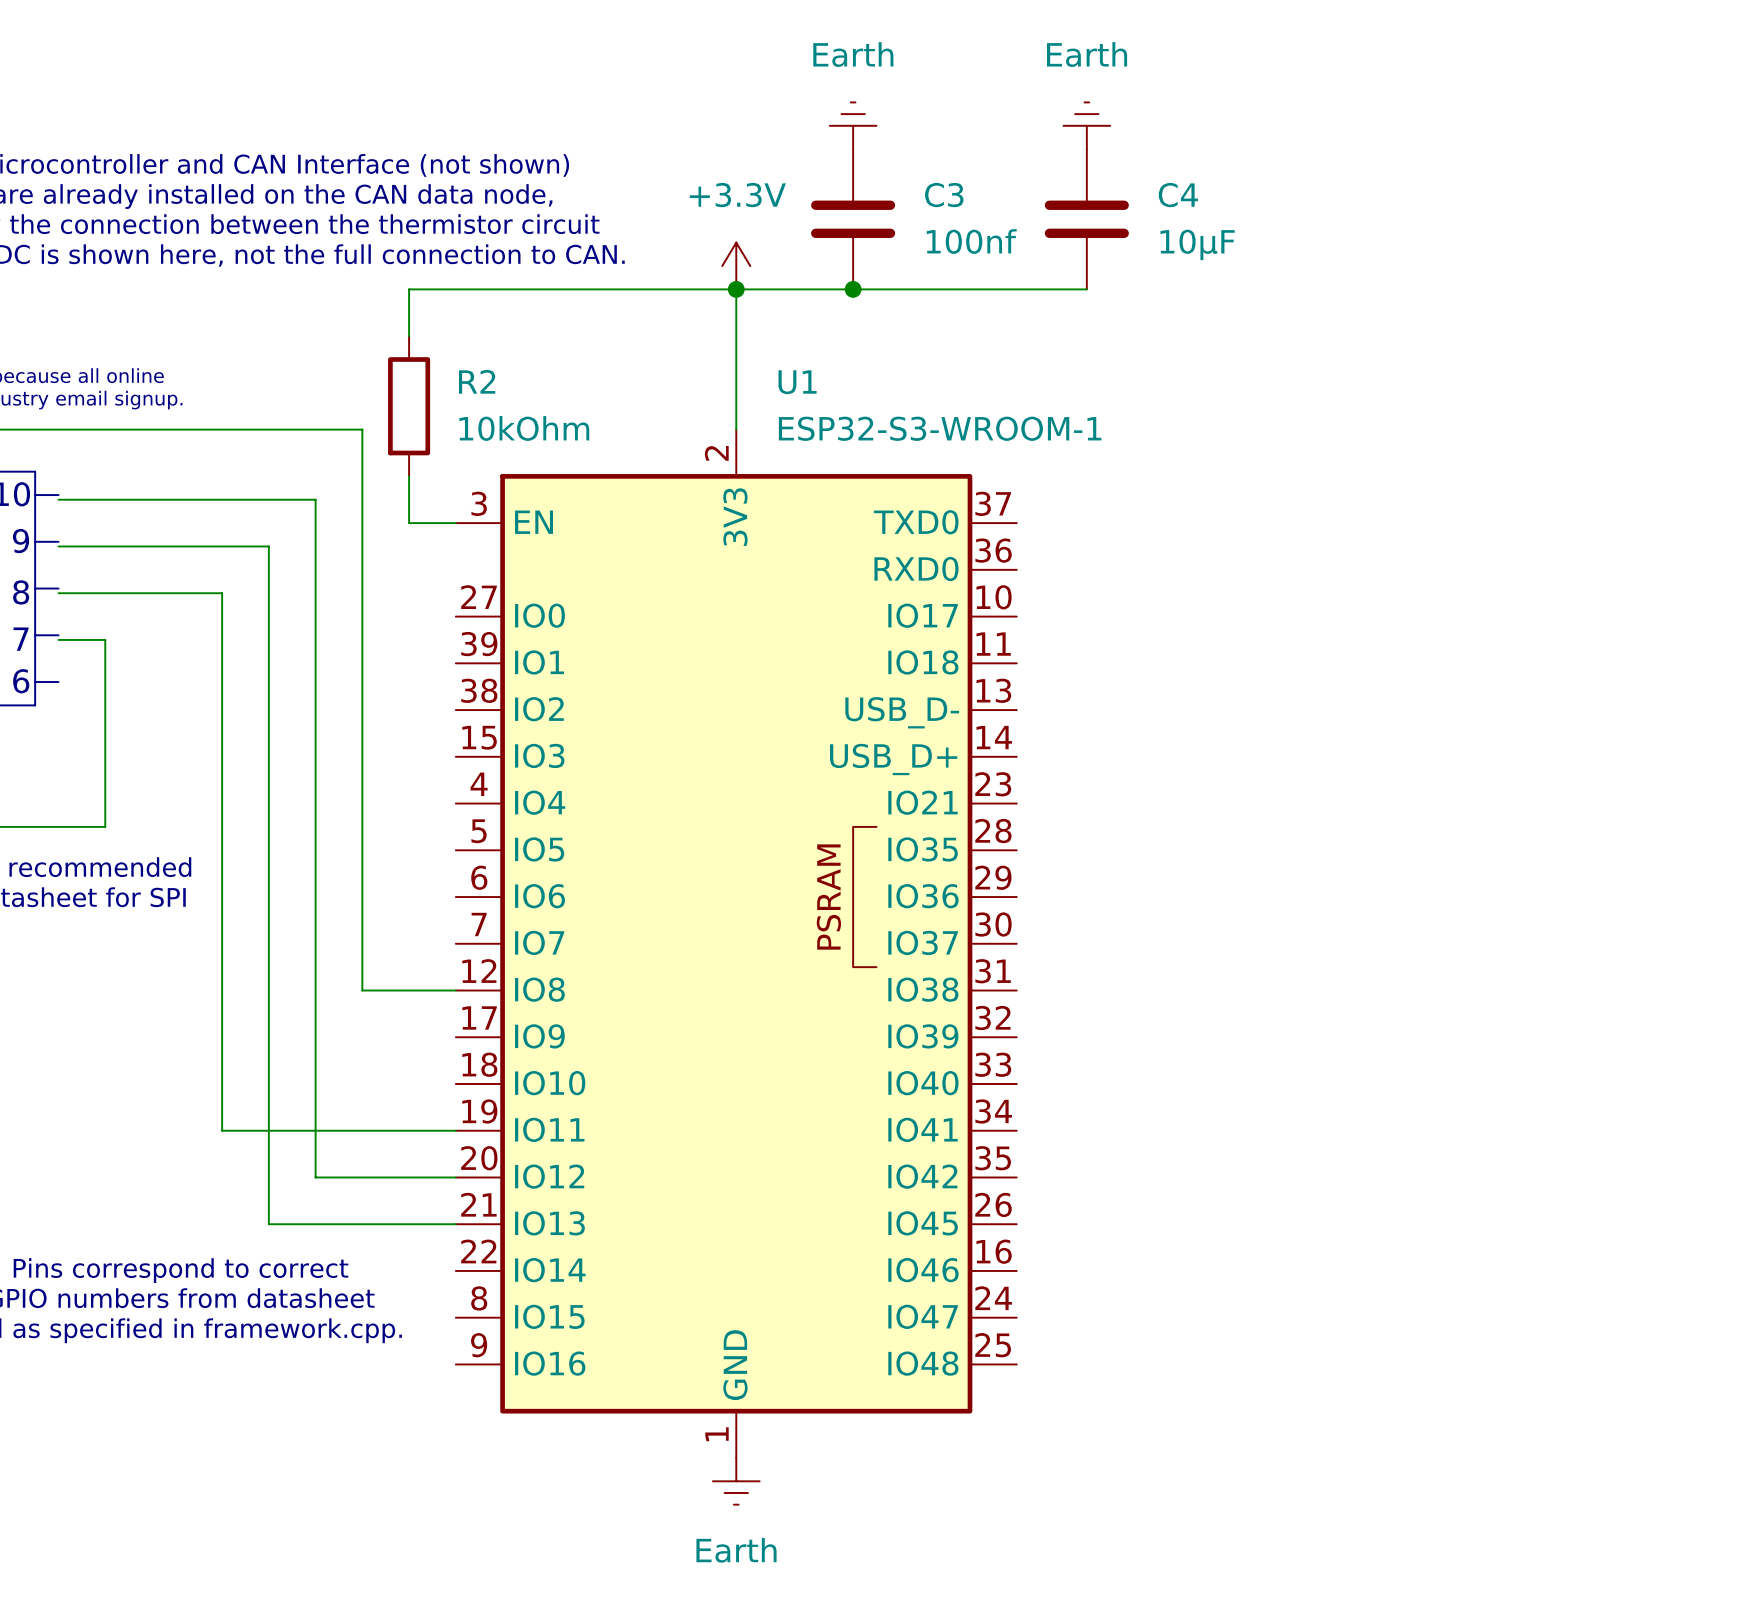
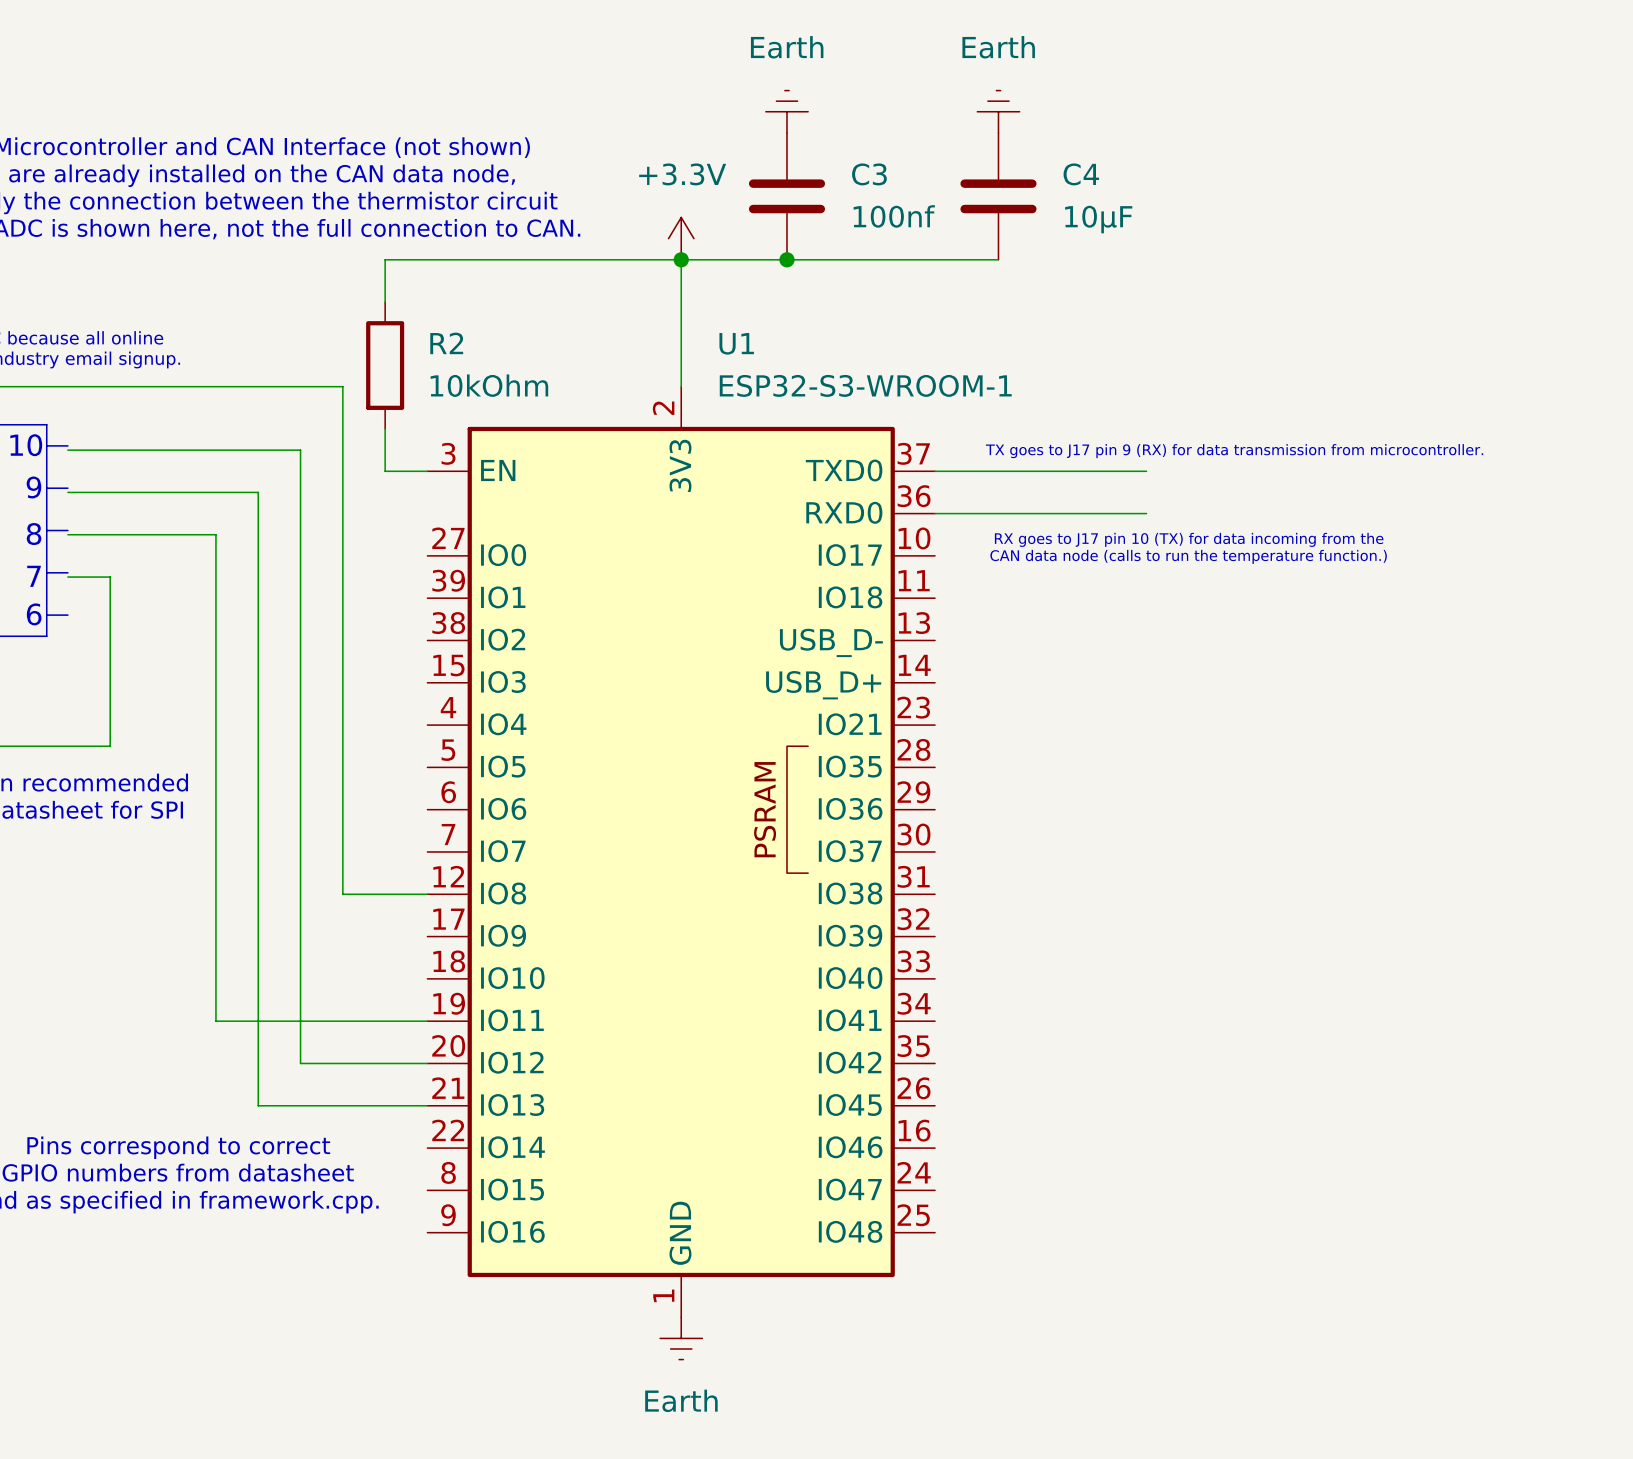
text: none -> TX goes to J17 pin 9 (RX) for data transmission from microcontroller. (1234, 451)
wire: none -> (935, 471) (1146, 471)
wire: none -> (935, 513) (1146, 513)
text: none -> RX goes to J17 pin 10 (TX) for data incoming from the (1189, 539)
text: none -> CAN data node (calls to run the temperature function.) (1188, 556)

